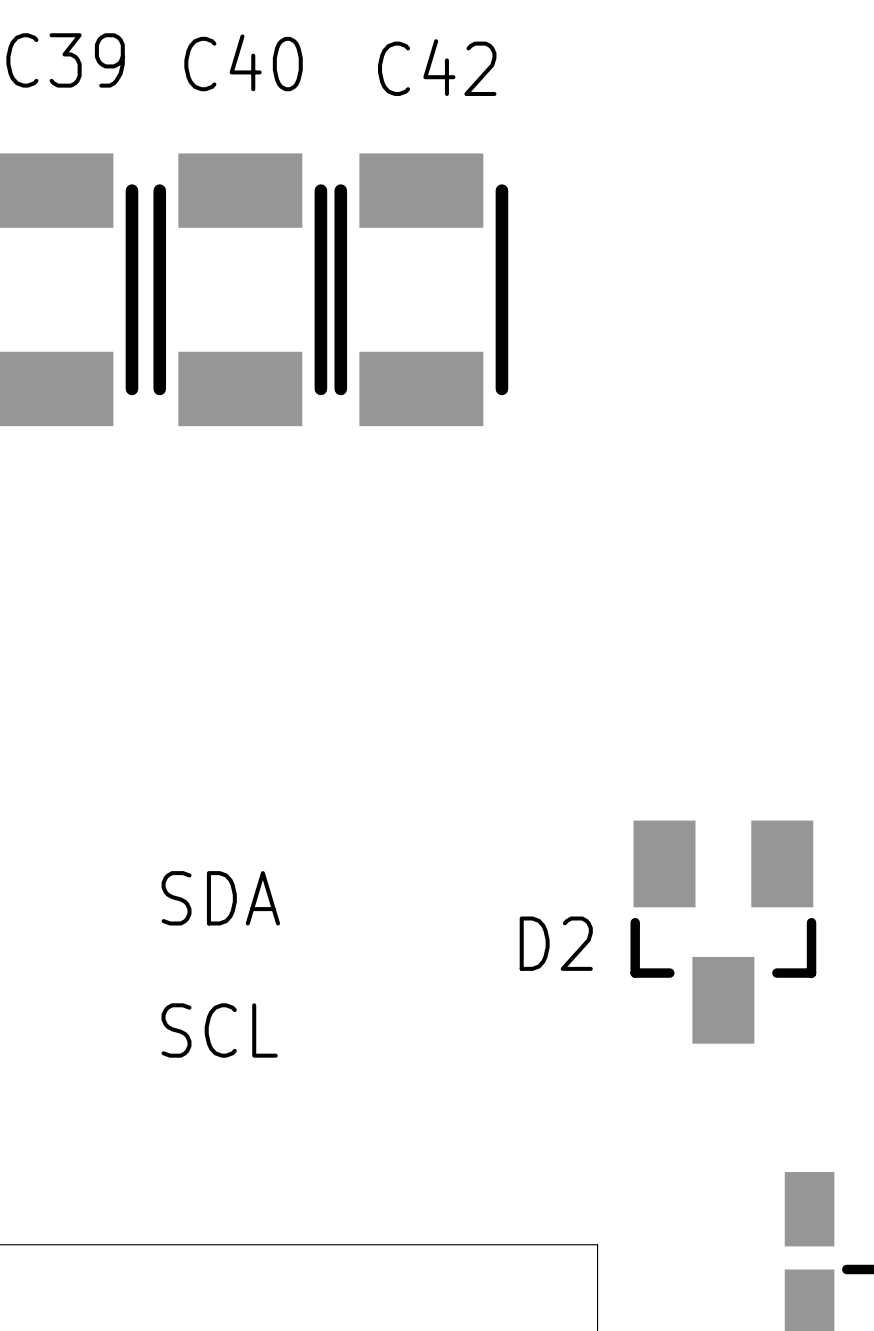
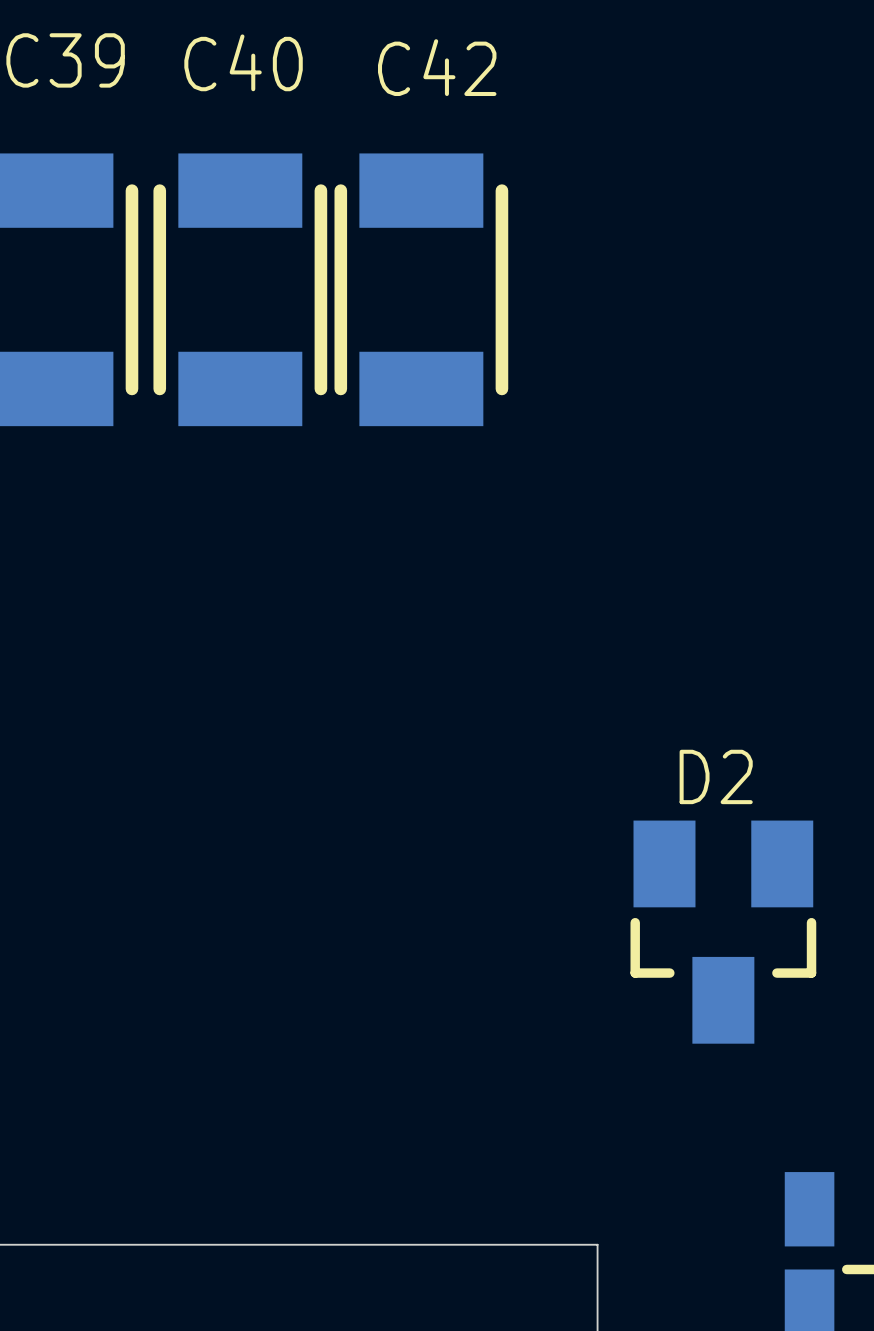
text: SDA (220, 898) -> none
D2 name position: D2 (556, 943) -> D2 (716, 776)
text: SCL (219, 1030) -> none

